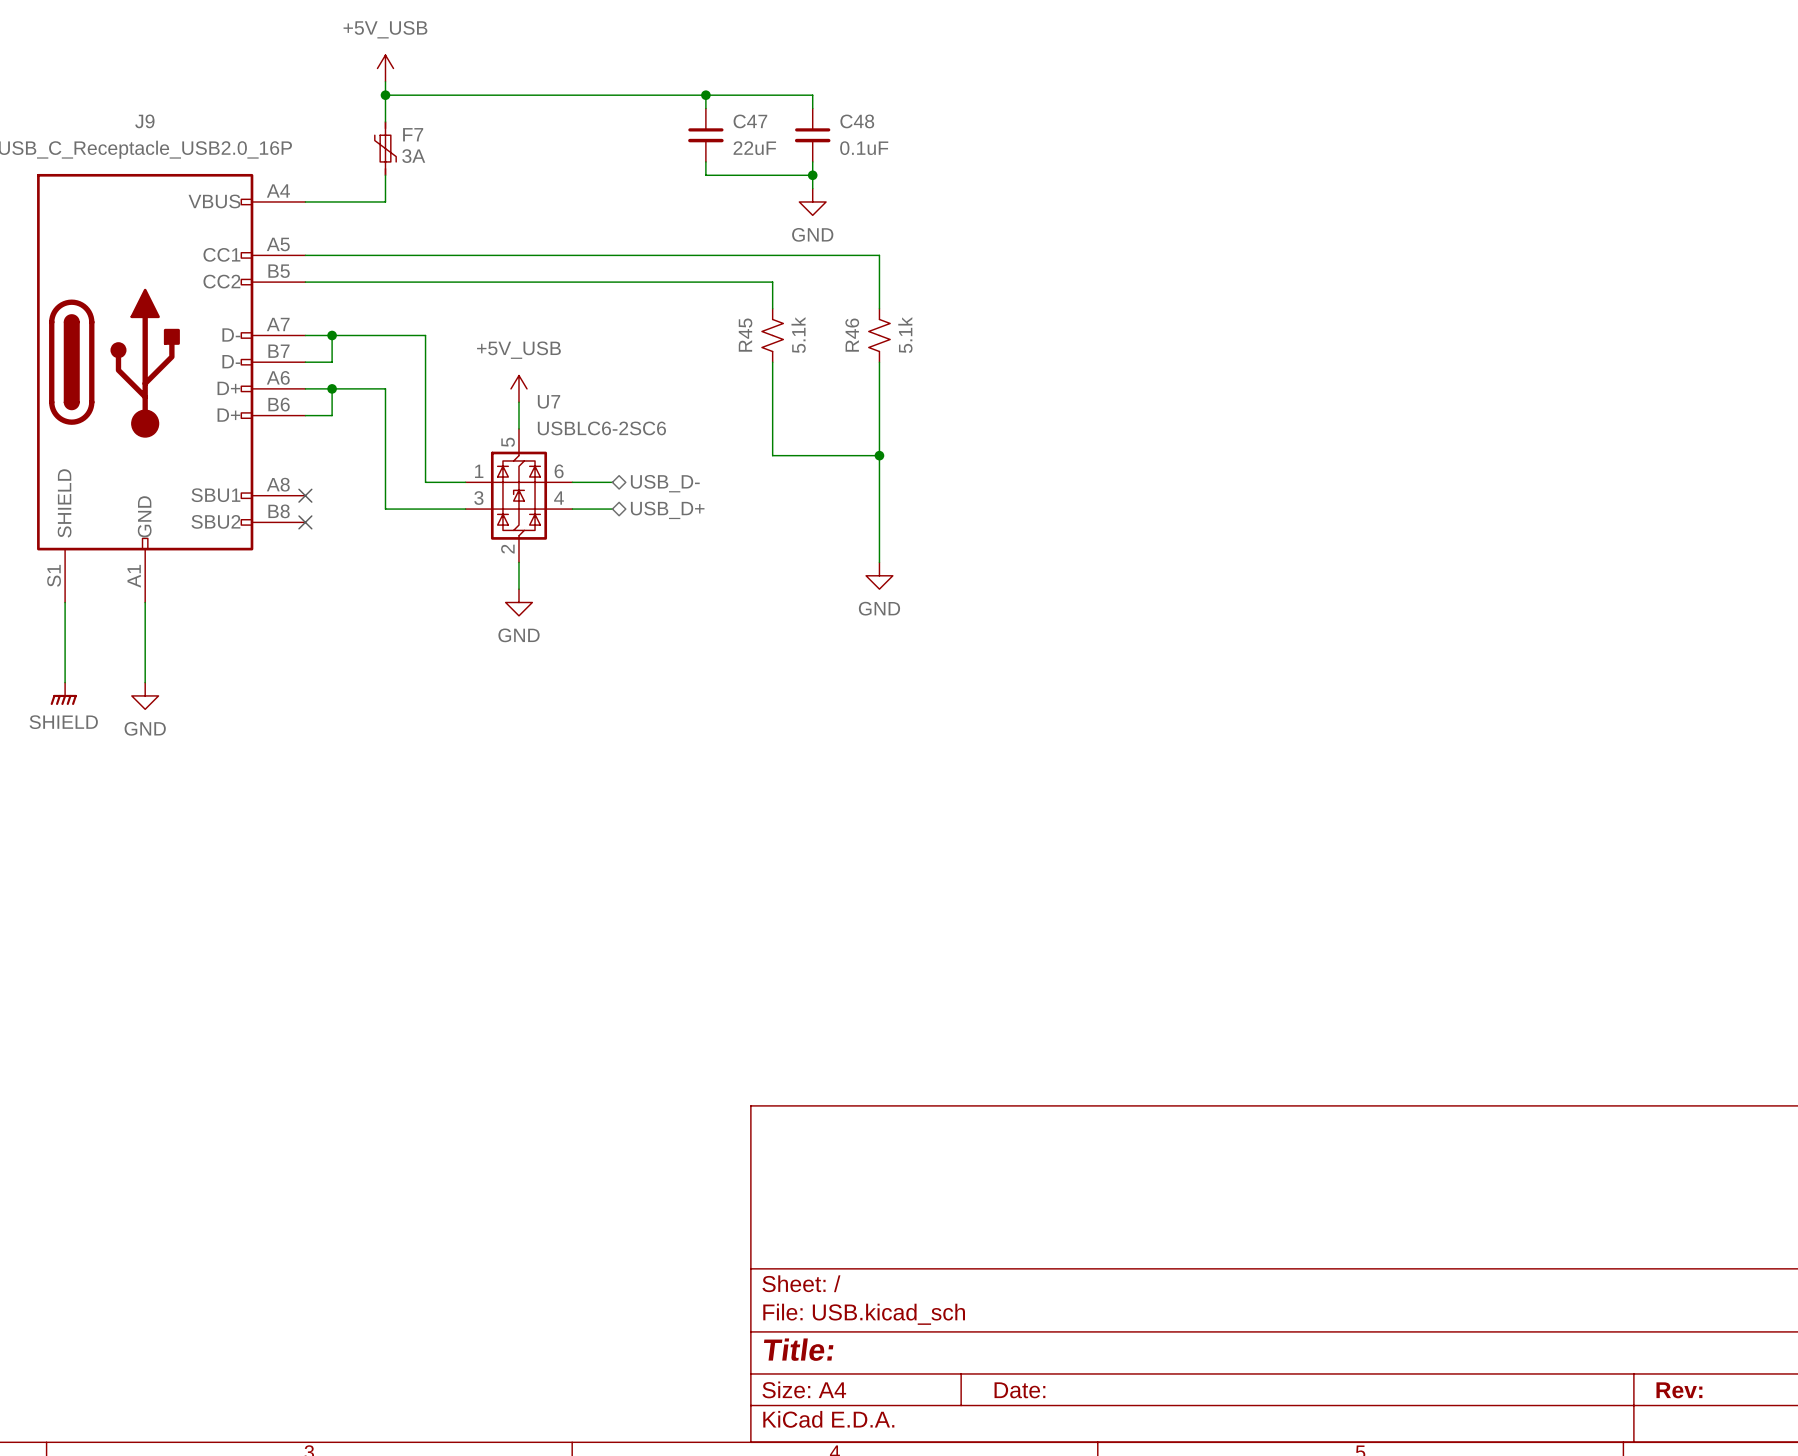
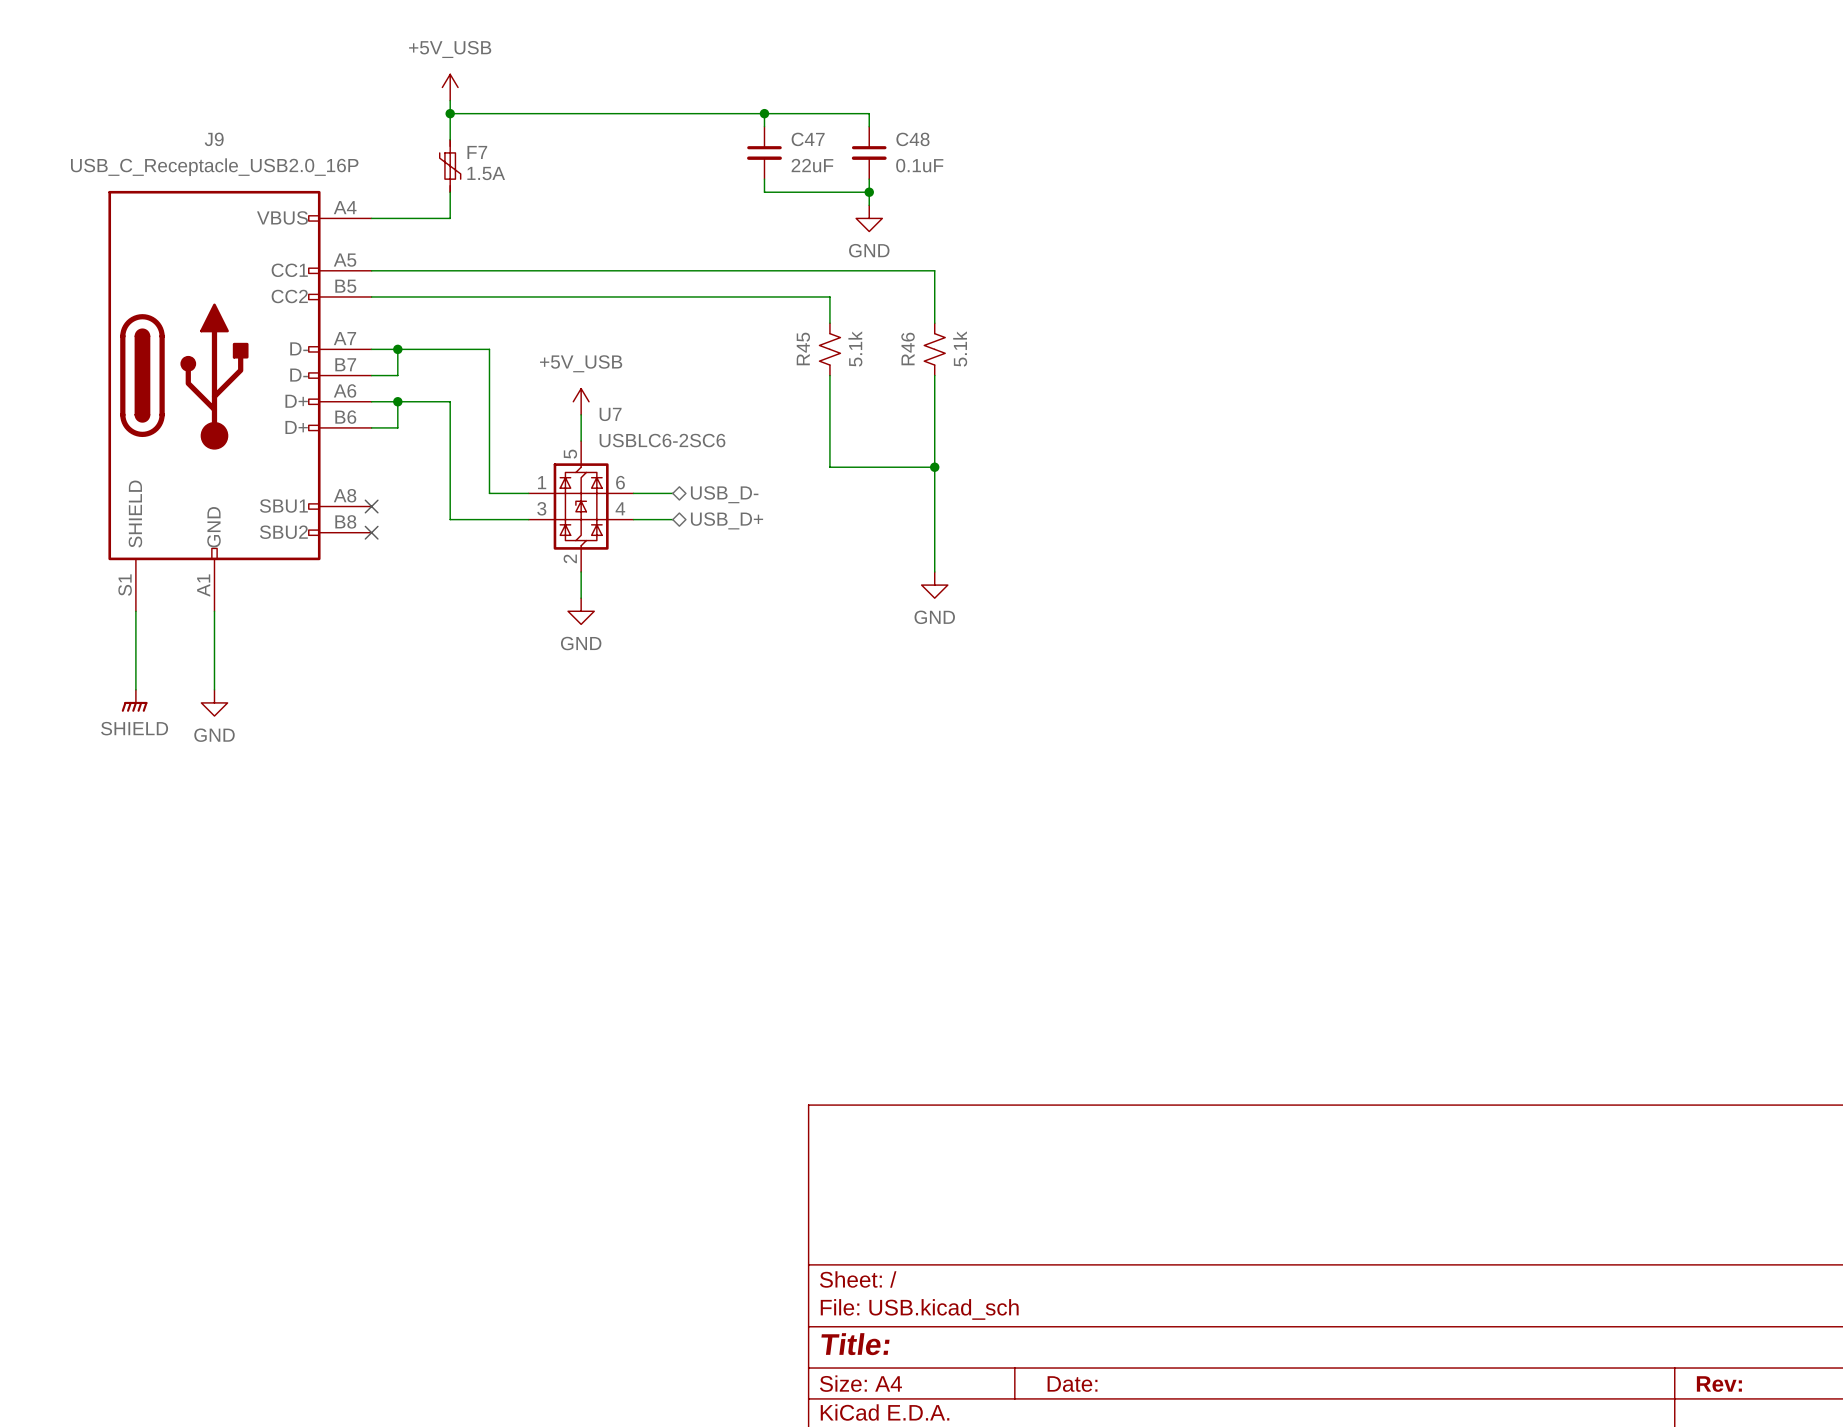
F7 value: 3A (413, 156) -> 1.5A (486, 173)

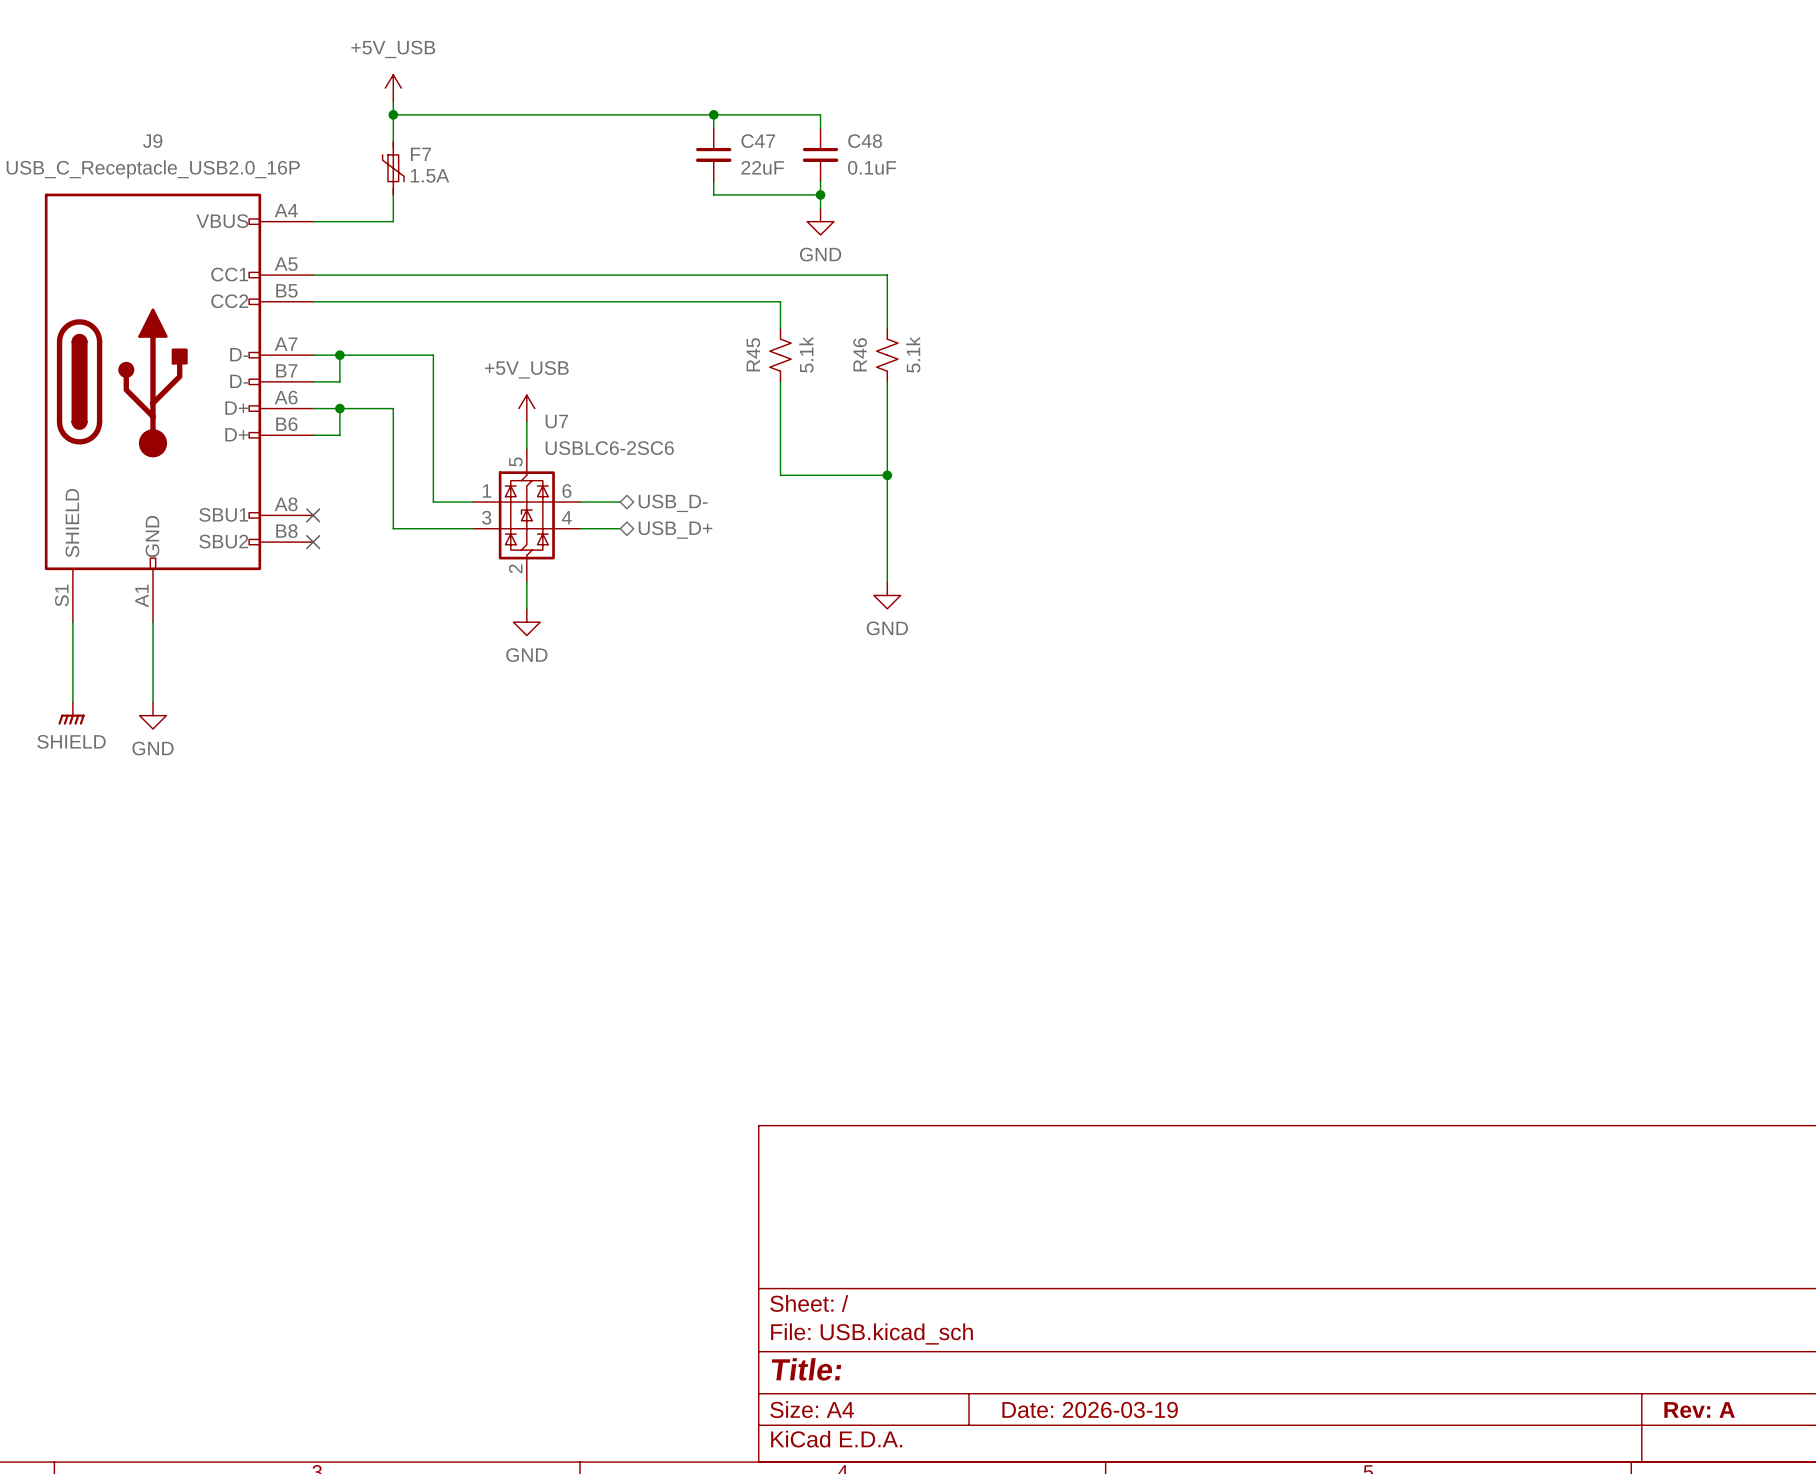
title block: Date: (1072, 1384) -> Date: 2026-03-19 (1090, 1409)
title block: Rev: (1719, 1384) -> Rev: A (1699, 1410)

